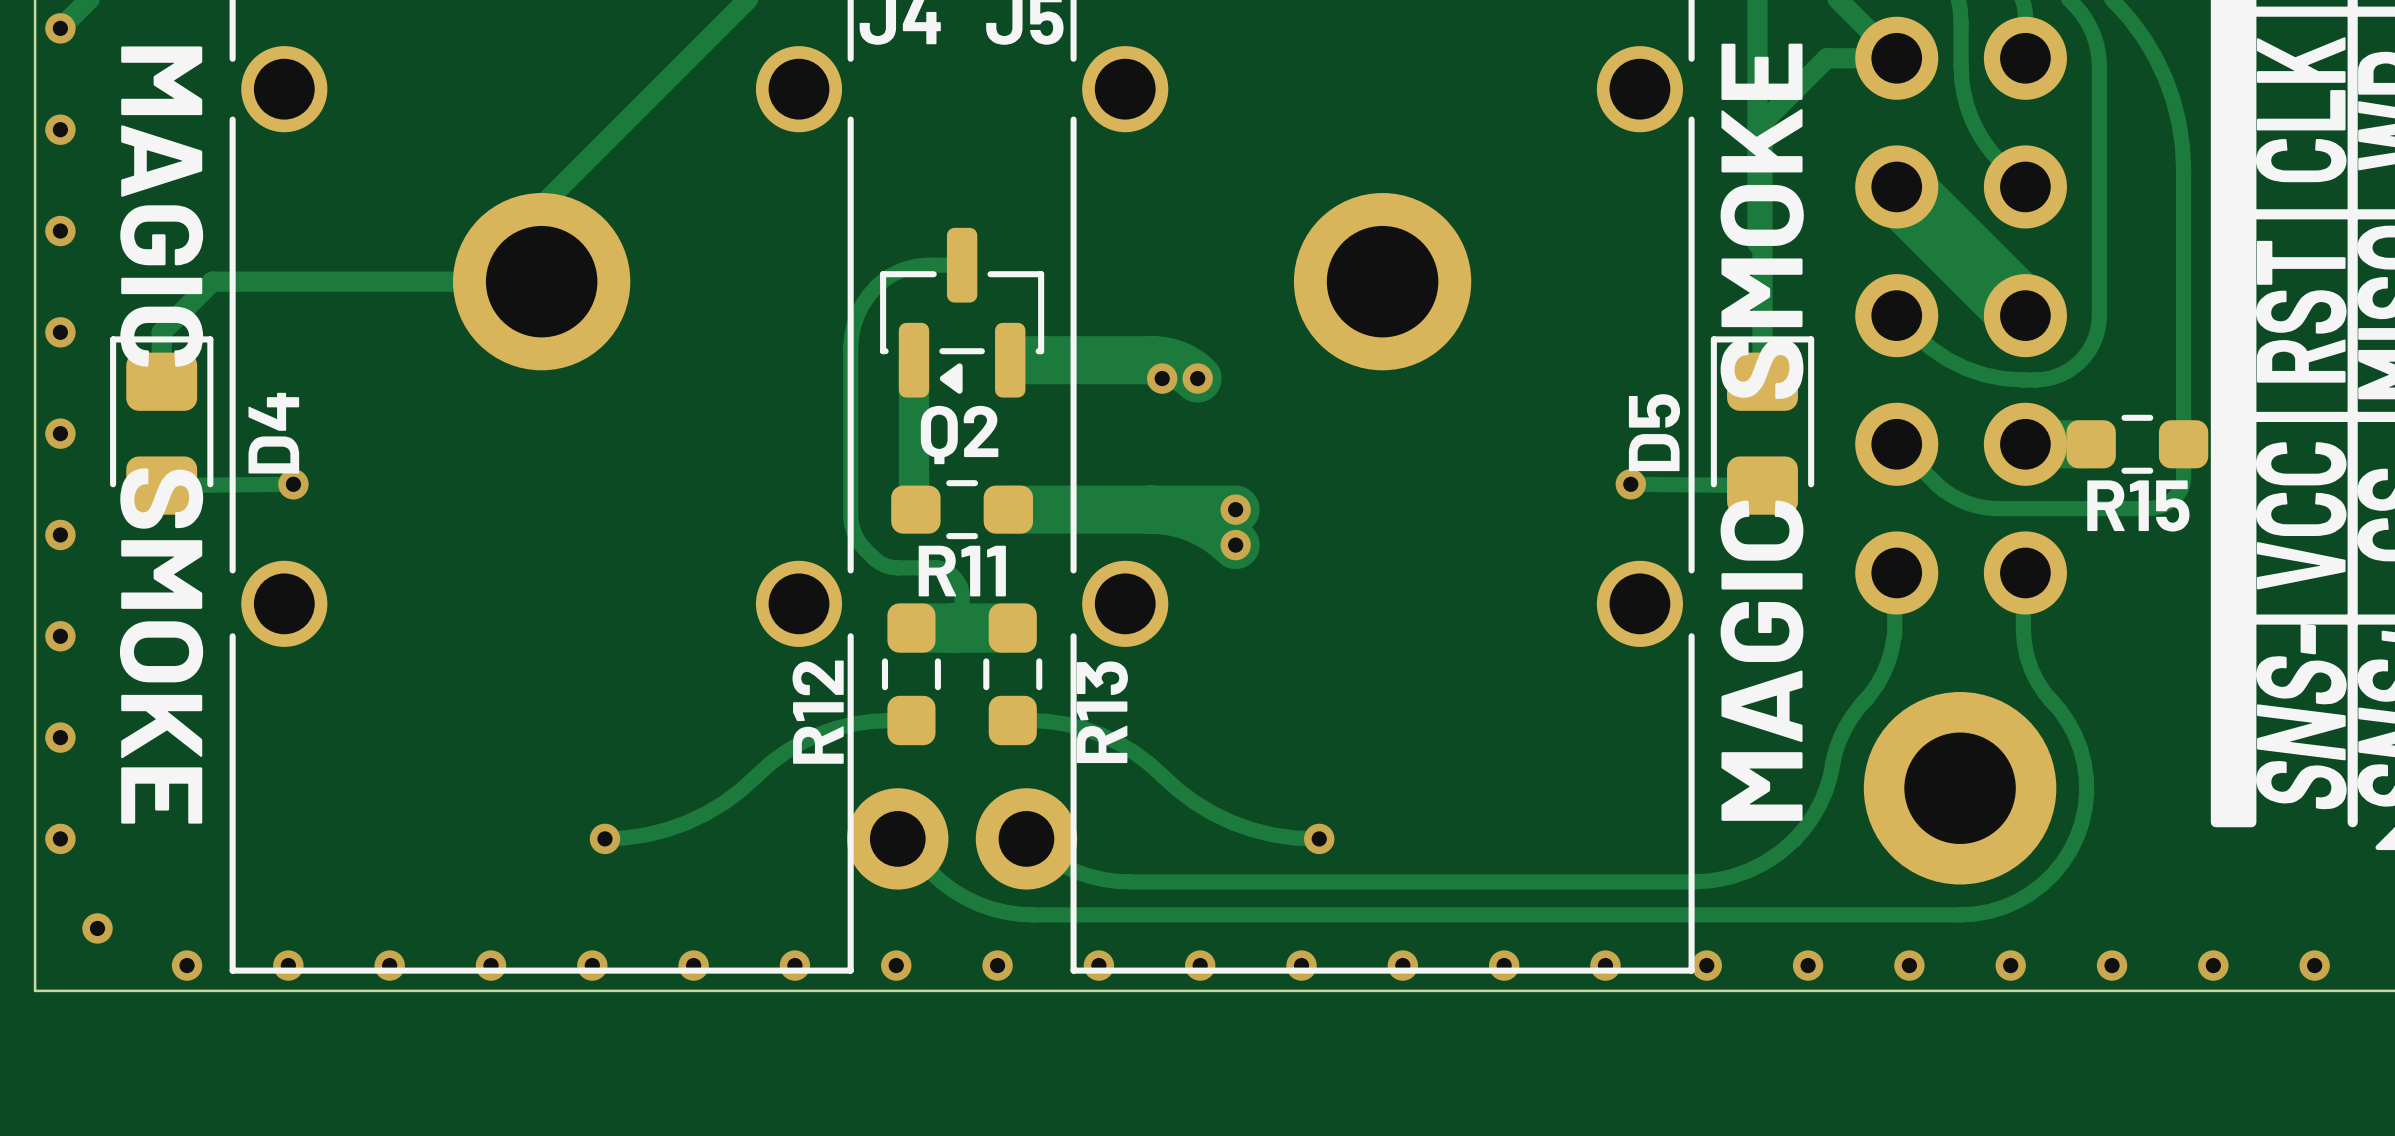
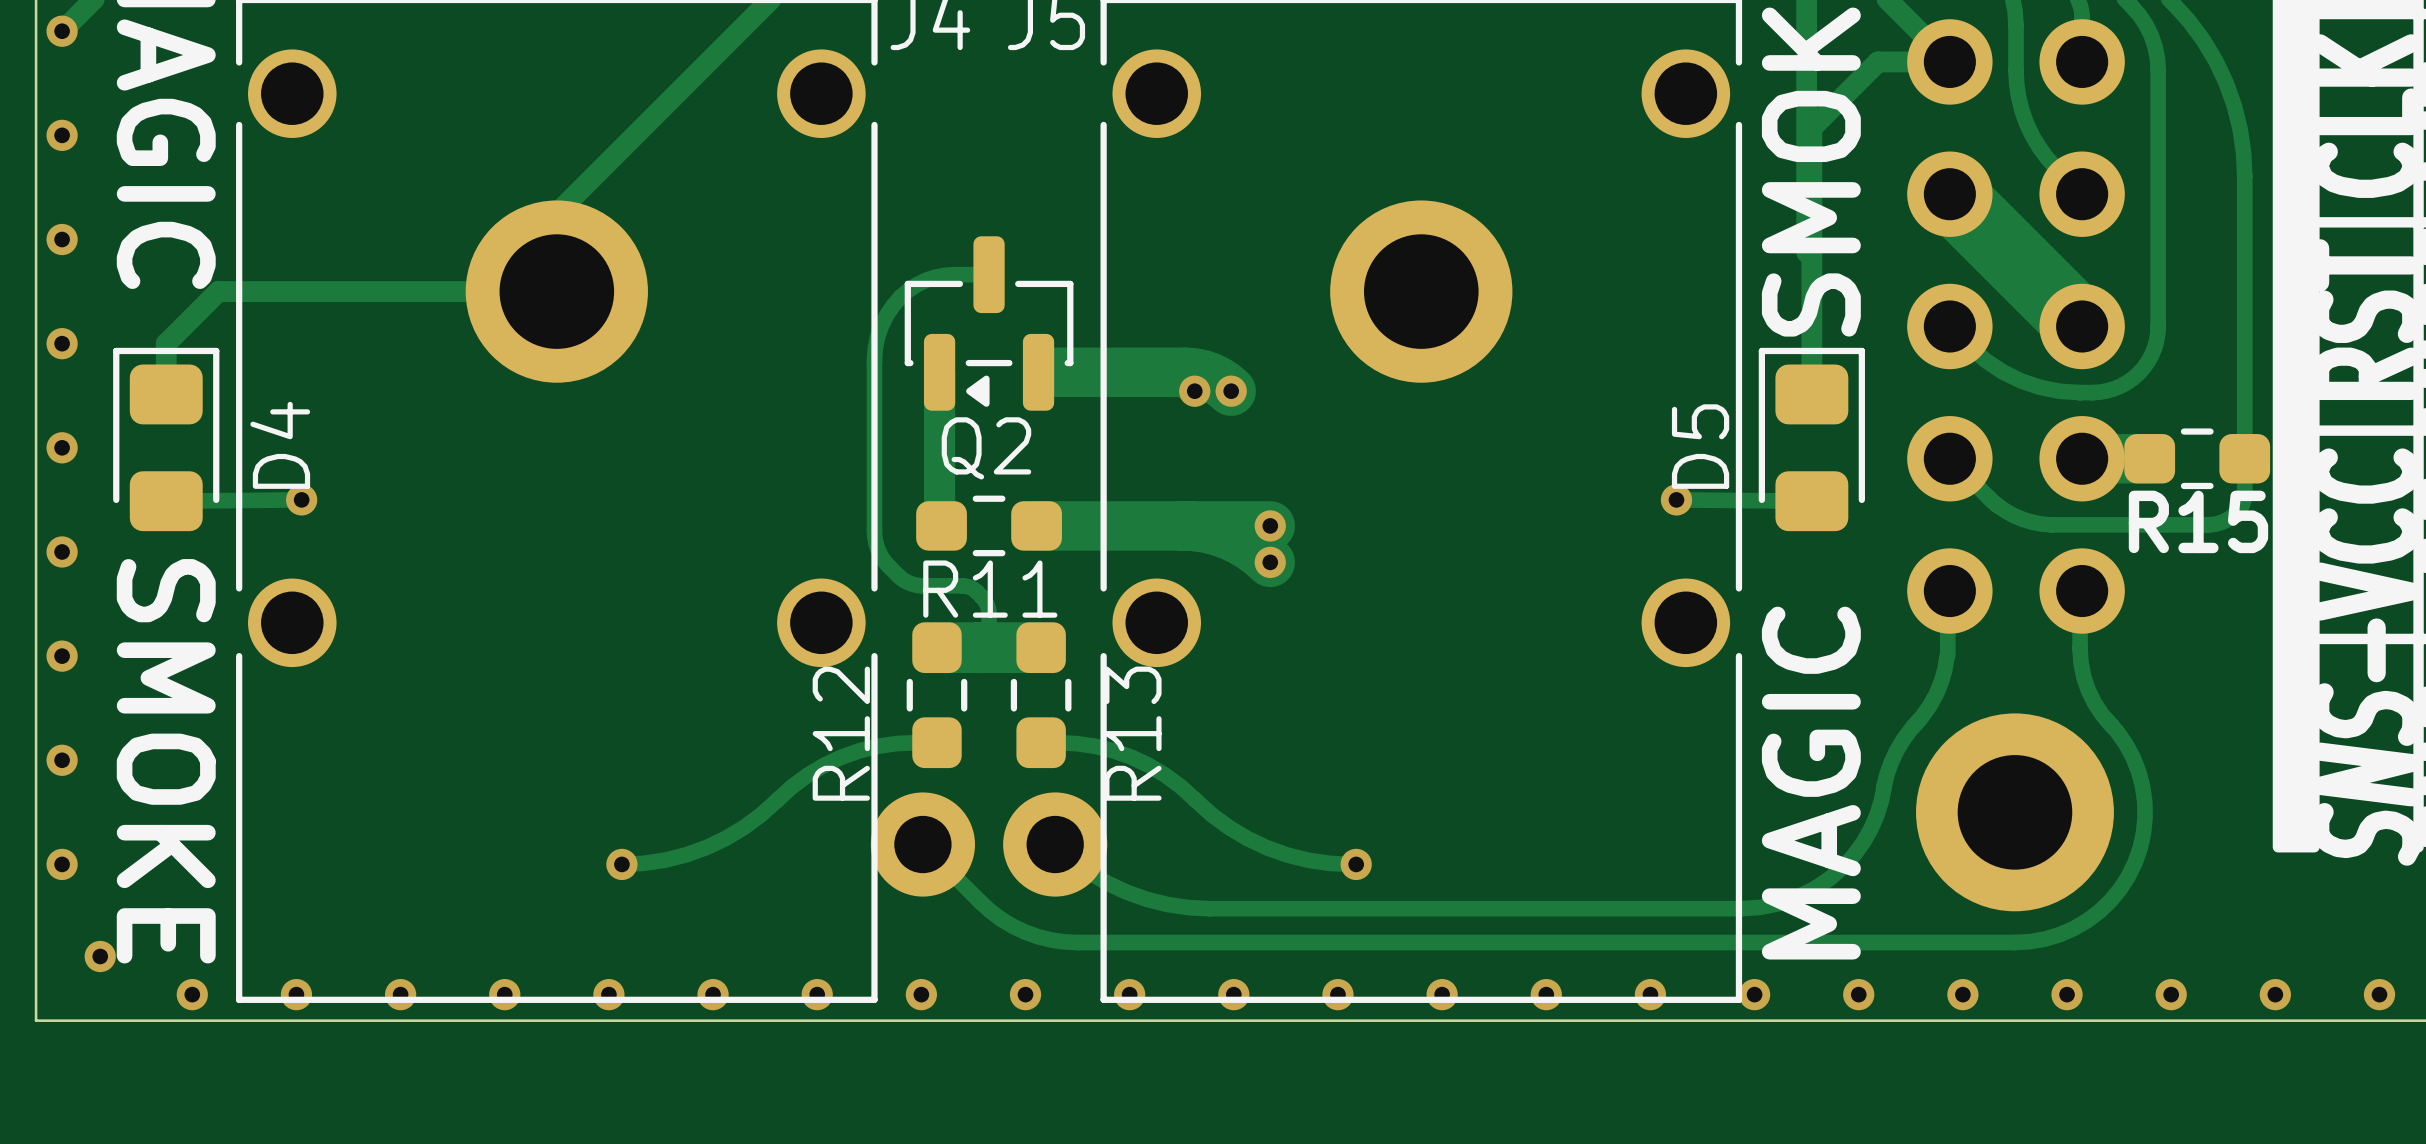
track: (897, 838) (942, 882) (965, 898) (1005, 912) (1048, 914) -> (922, 844) (980, 902) (1001, 919) (1037, 936) (1077, 942)
part position: (962, 838) -> (989, 844)
track: (1026, 838) (1048, 857) (1087, 875) (1115, 881) (1177, 881) -> (1055, 844) (1088, 871) (1126, 892) (1167, 904) (1210, 908)

